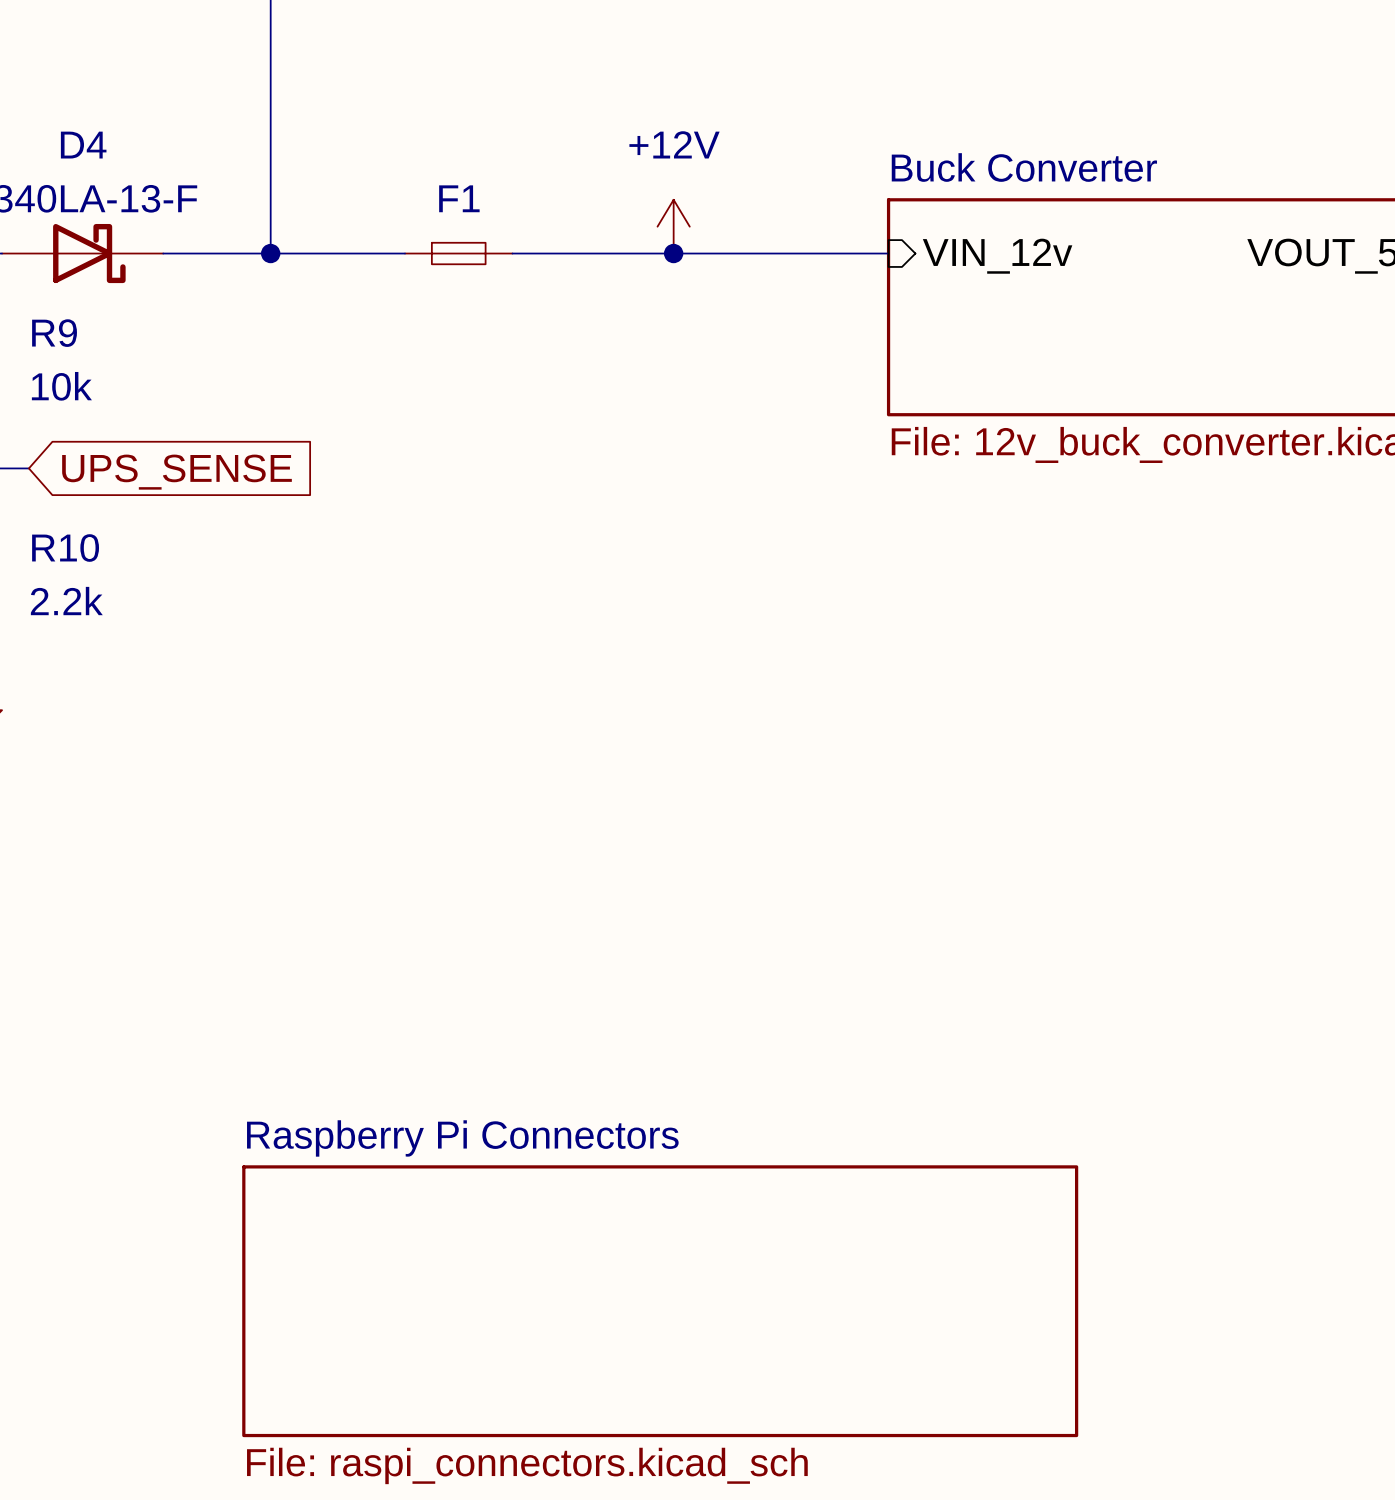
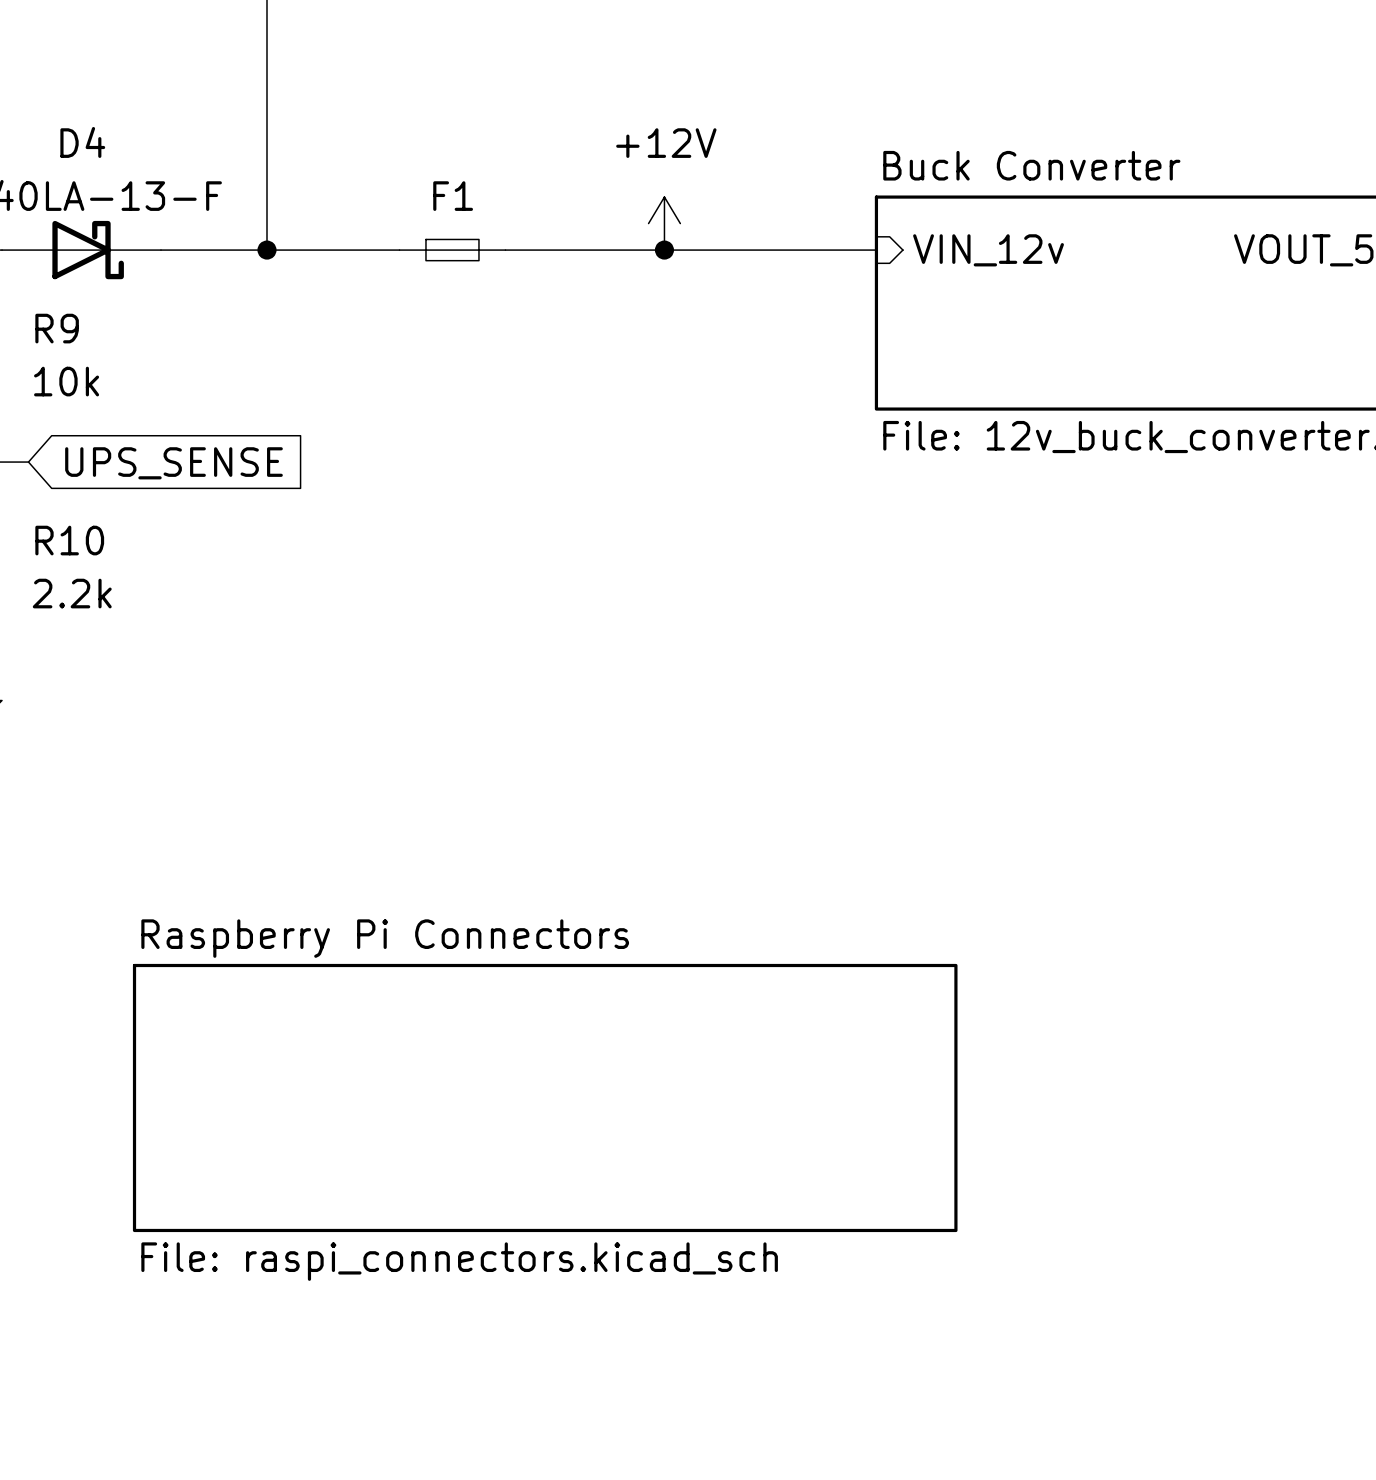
sheet Raspberry Pi Connectors position: (660, 1301) -> (545, 1097)

